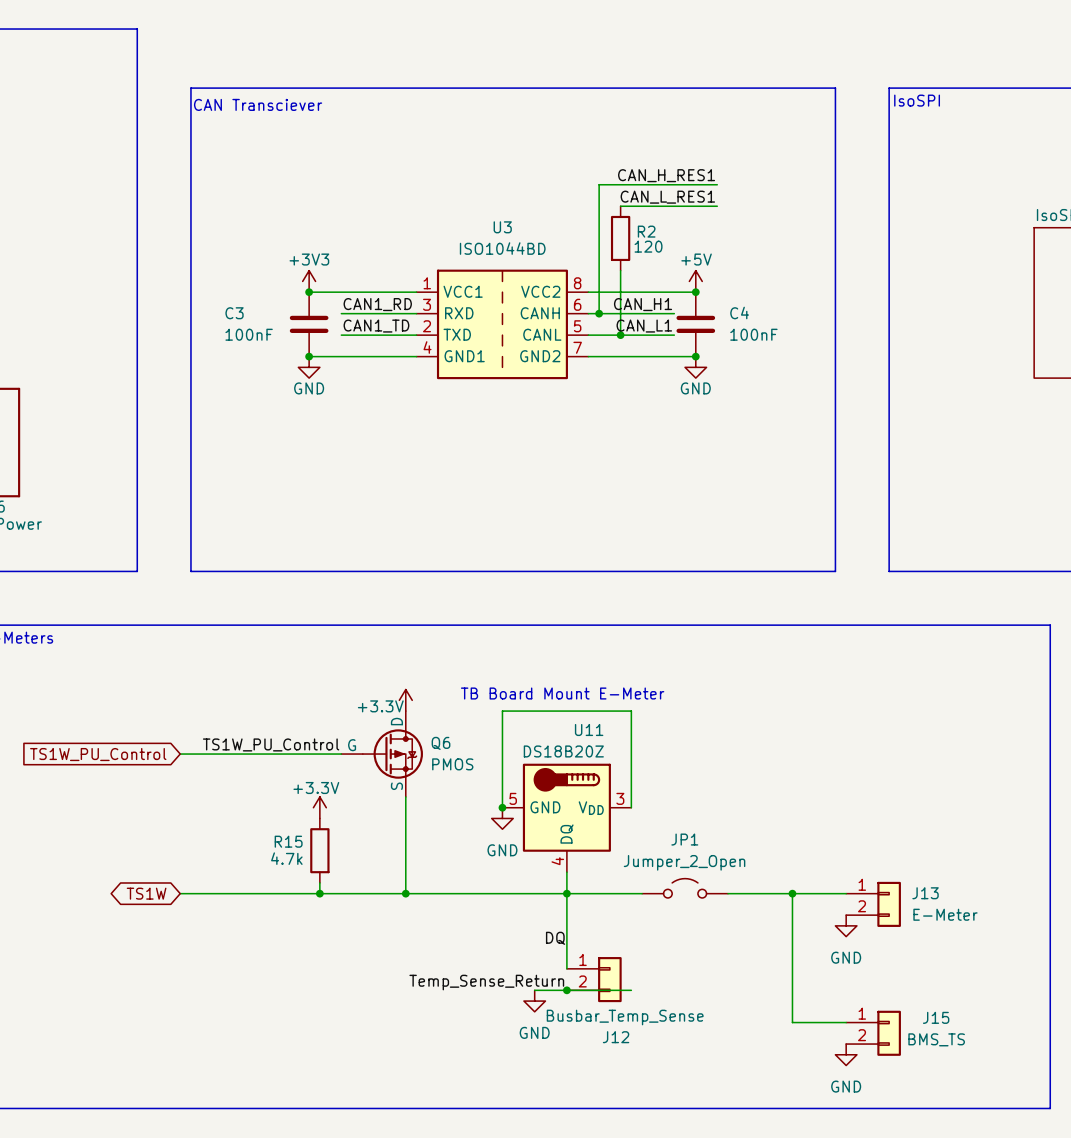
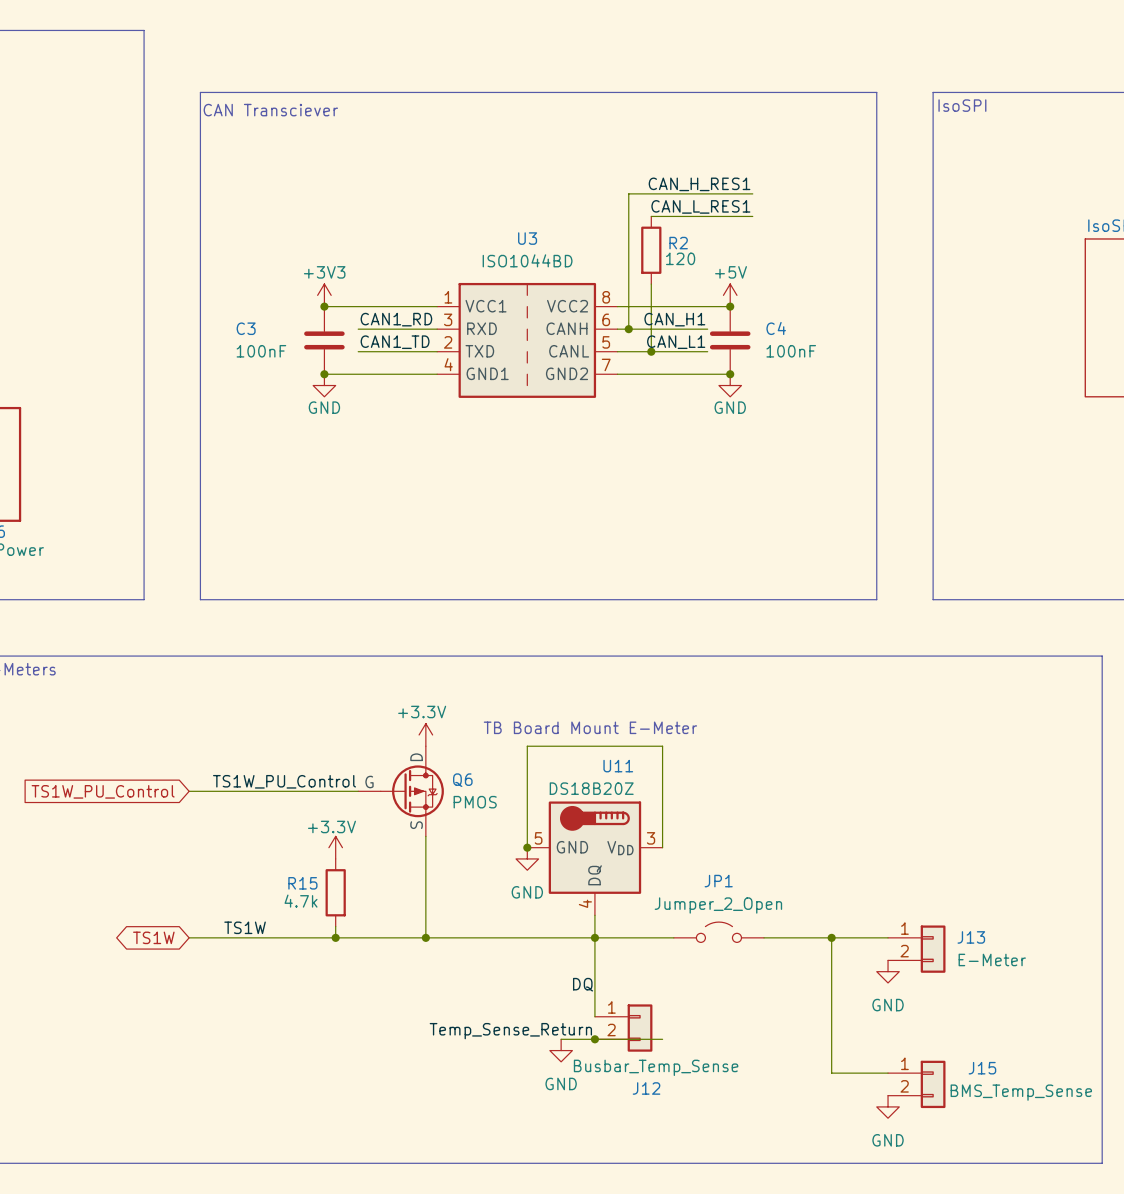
power symbol text position: +3.3V (380, 706) -> +3.3V (422, 711)
label: none -> TS1W (245, 927)
J15 value: BMS_TS (936, 1039) -> BMS_Temp_Sense (1021, 1092)

